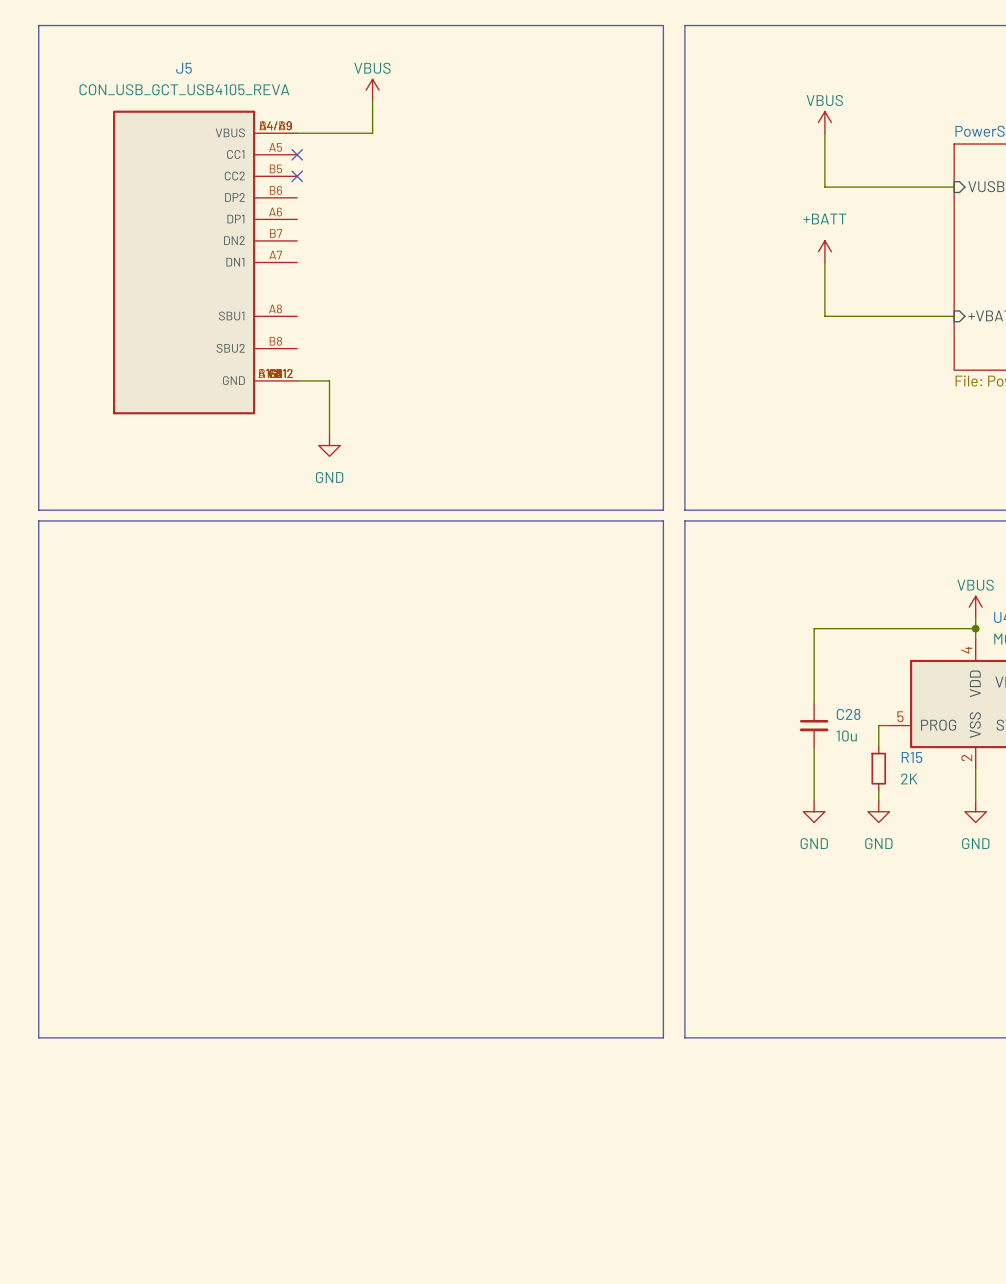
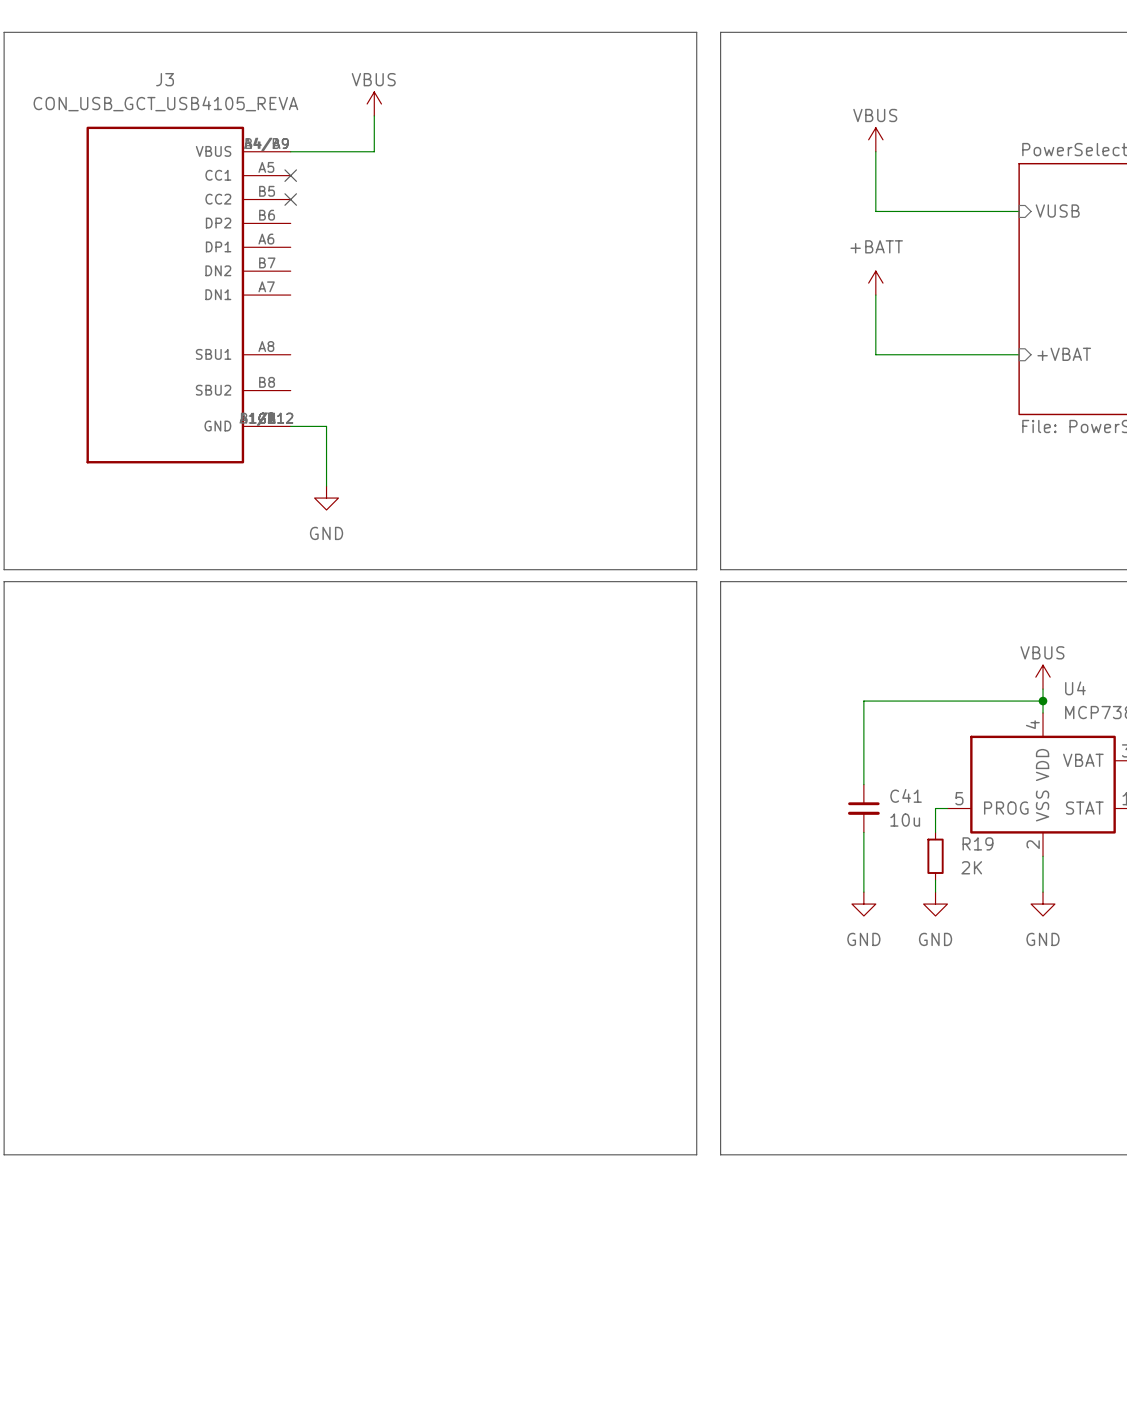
J5 name: J5 (183, 68) -> J3 (165, 79)
C28 name: C28 (848, 714) -> C41 (906, 795)
R15 name: R15 (912, 757) -> R19 (977, 843)

